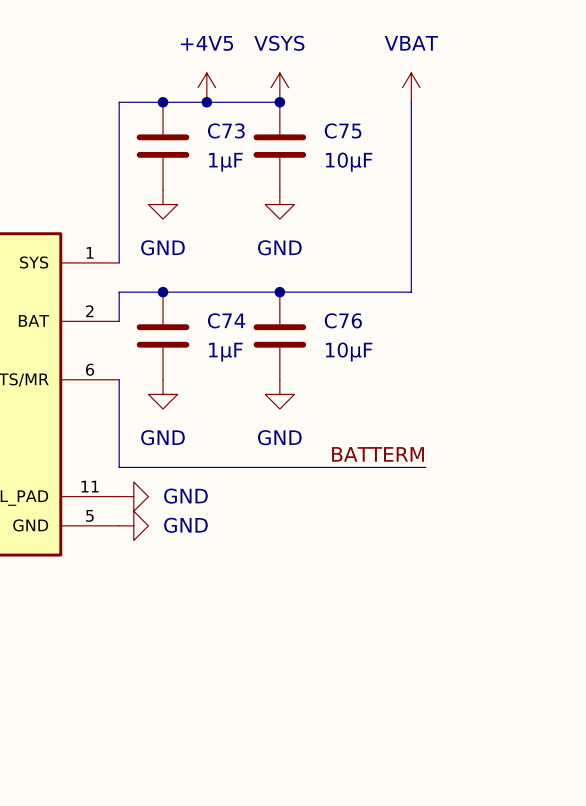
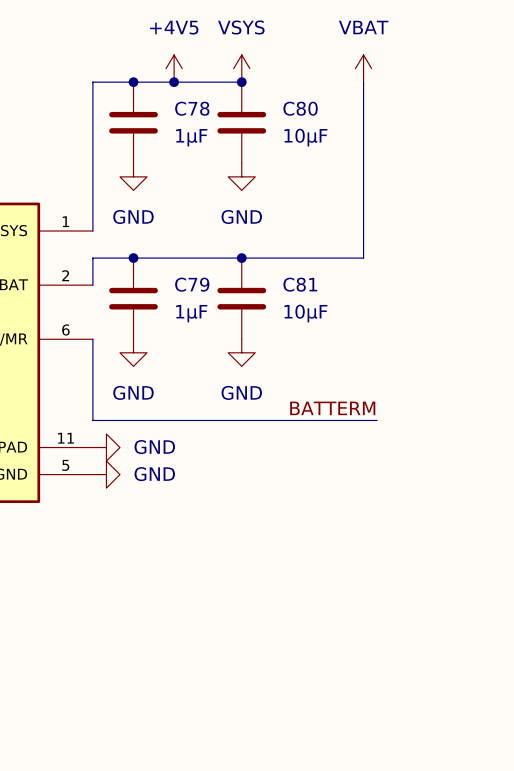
C73 name: C73 (226, 130) -> C78 (192, 108)
C75 name: C75 (343, 130) -> C80 (300, 108)
C74 name: C74 (226, 320) -> C79 (192, 284)
C76 name: C76 (343, 320) -> C81 (300, 284)

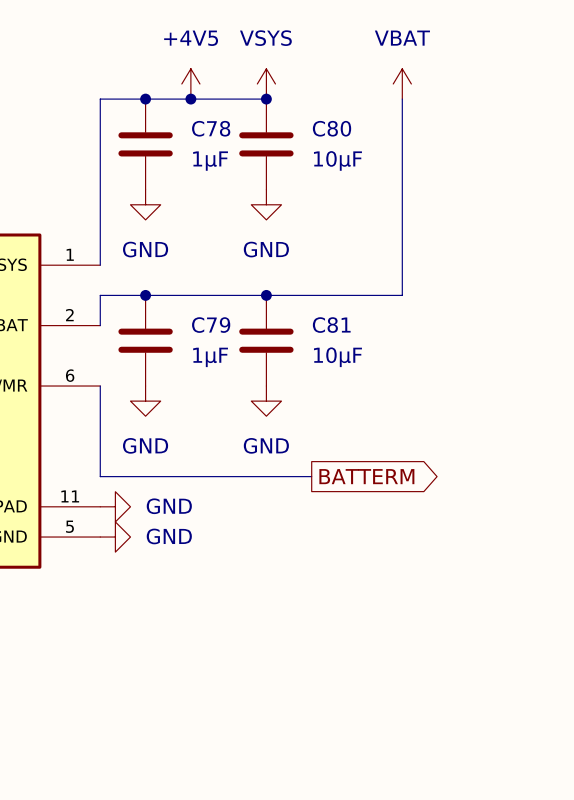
label: BATTERM (332, 408) -> none
wire: (282, 420) (377, 420) -> none
global label: none -> BATTERM (366, 476)

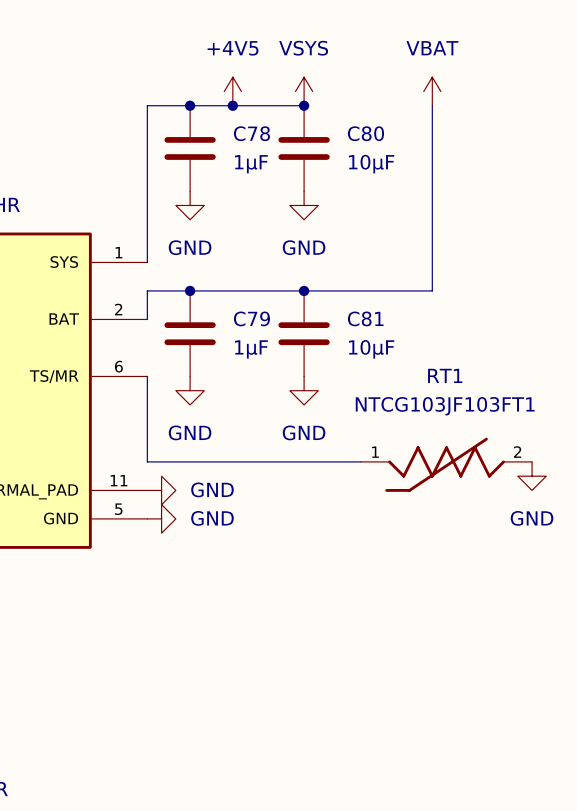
global label: BATTERM (366, 476) -> none
RT1: none -> NTCG103JF103FT1 (446, 464)
power symbol: none -> GND (532, 476)

